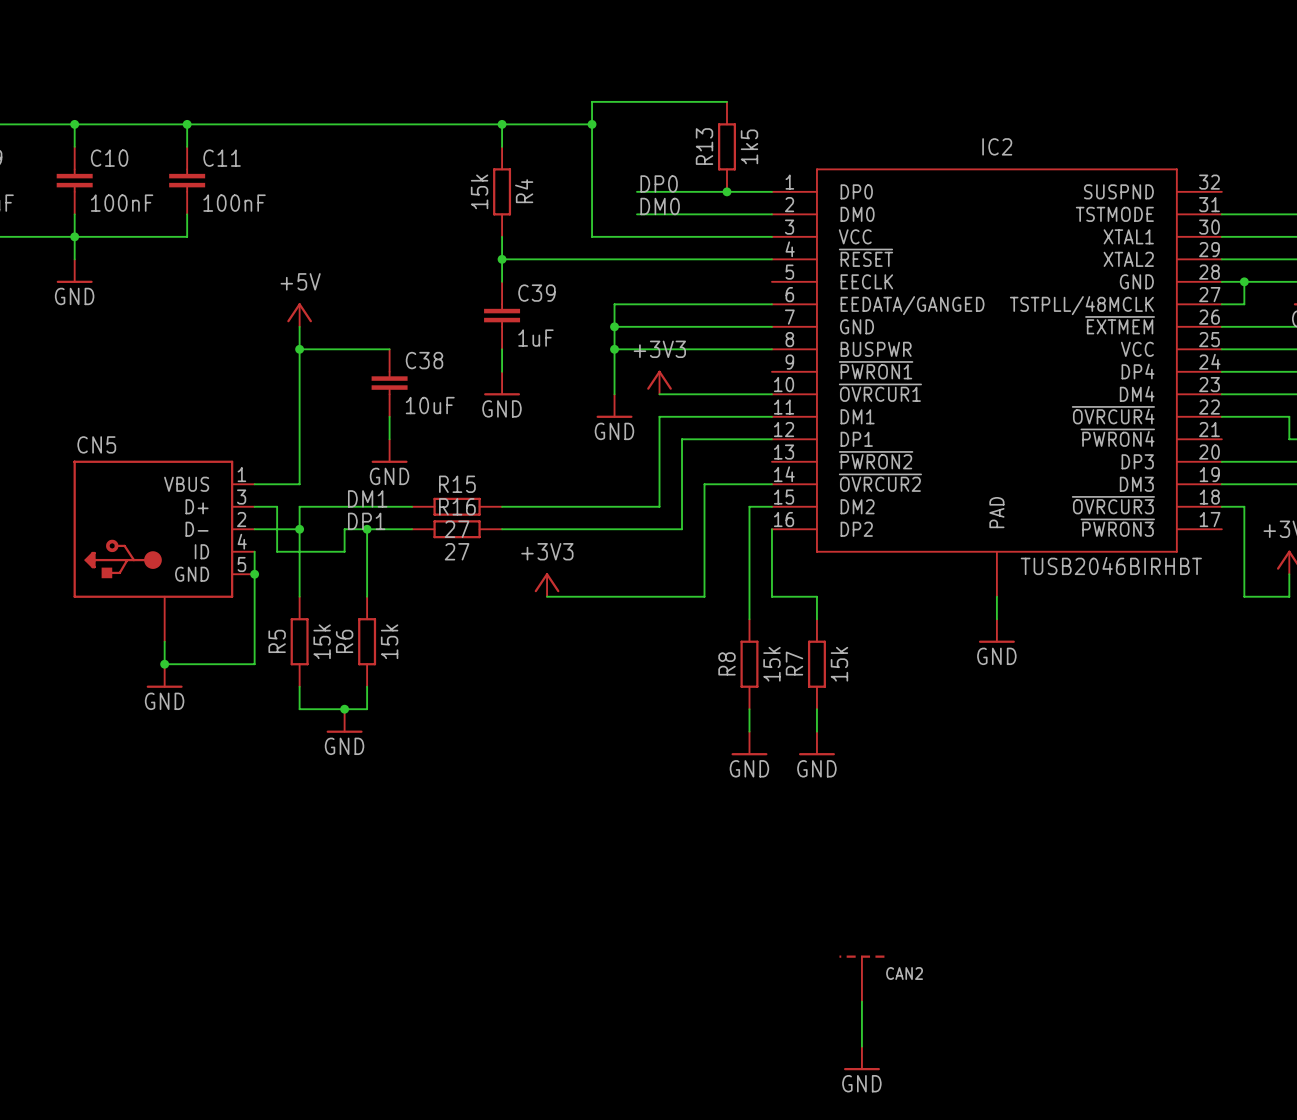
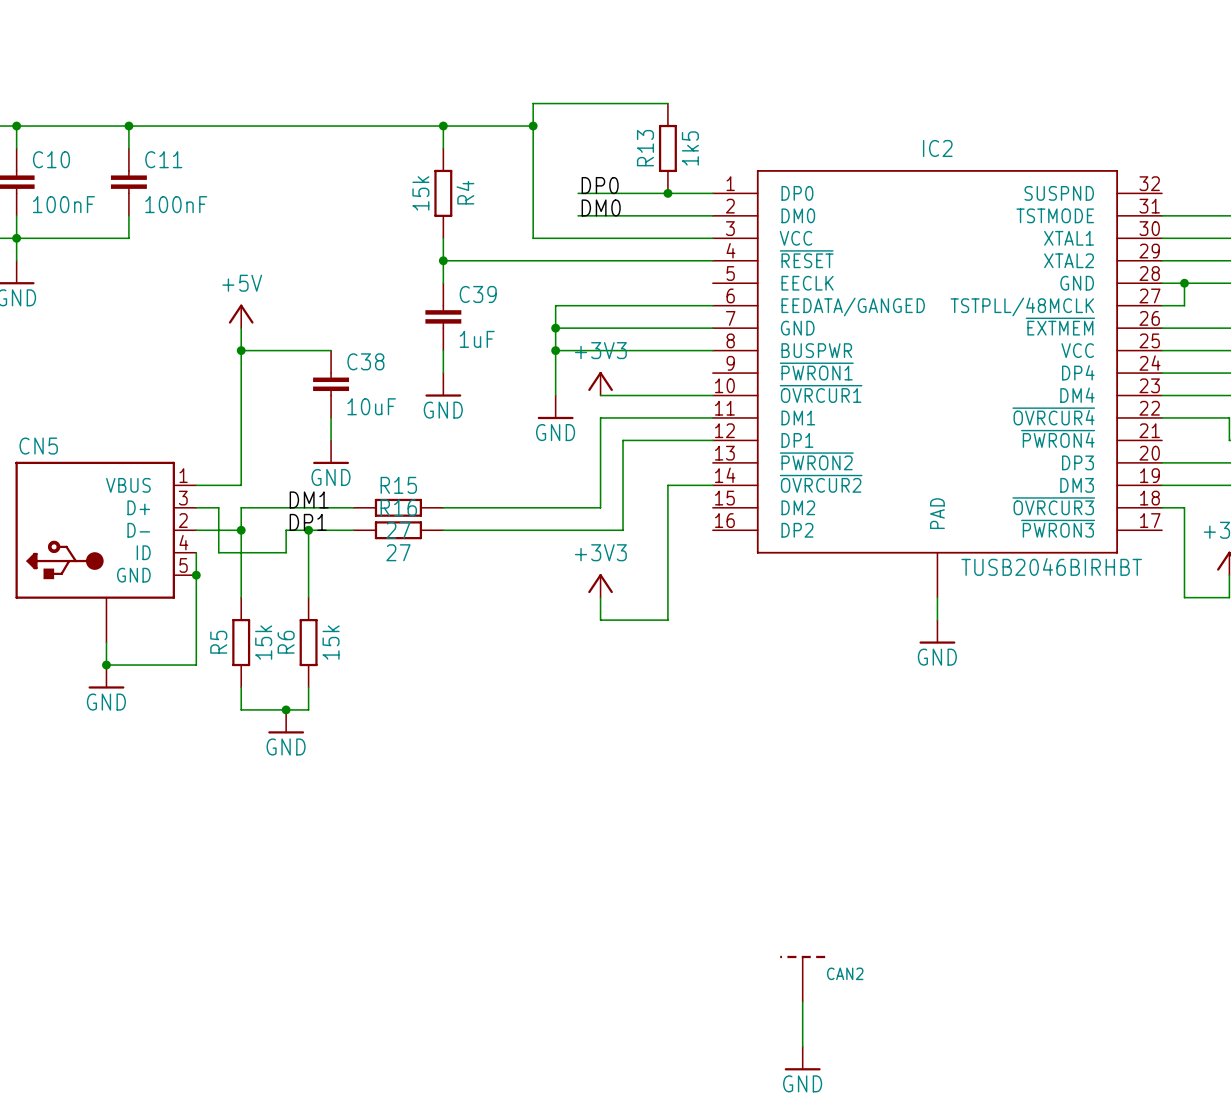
wire: (726, 484) (704, 484) (704, 596) (547, 596) -> (667, 485) (667, 620) (600, 620) (600, 597)
wire: (771, 506) (749, 506) (749, 619) -> none
wire: (771, 529) (771, 596) (816, 596) (816, 619) -> none
power symbol position: +3V3 (547, 584) -> +3V3 (600, 585)
R8: 15k (749, 664) -> none
R7: 15k (816, 664) -> none
wire: (749, 709) (749, 731) -> none
wire: (816, 709) (816, 731) -> none
power symbol: GND (749, 743) -> none
power symbol: GND (816, 743) -> none

